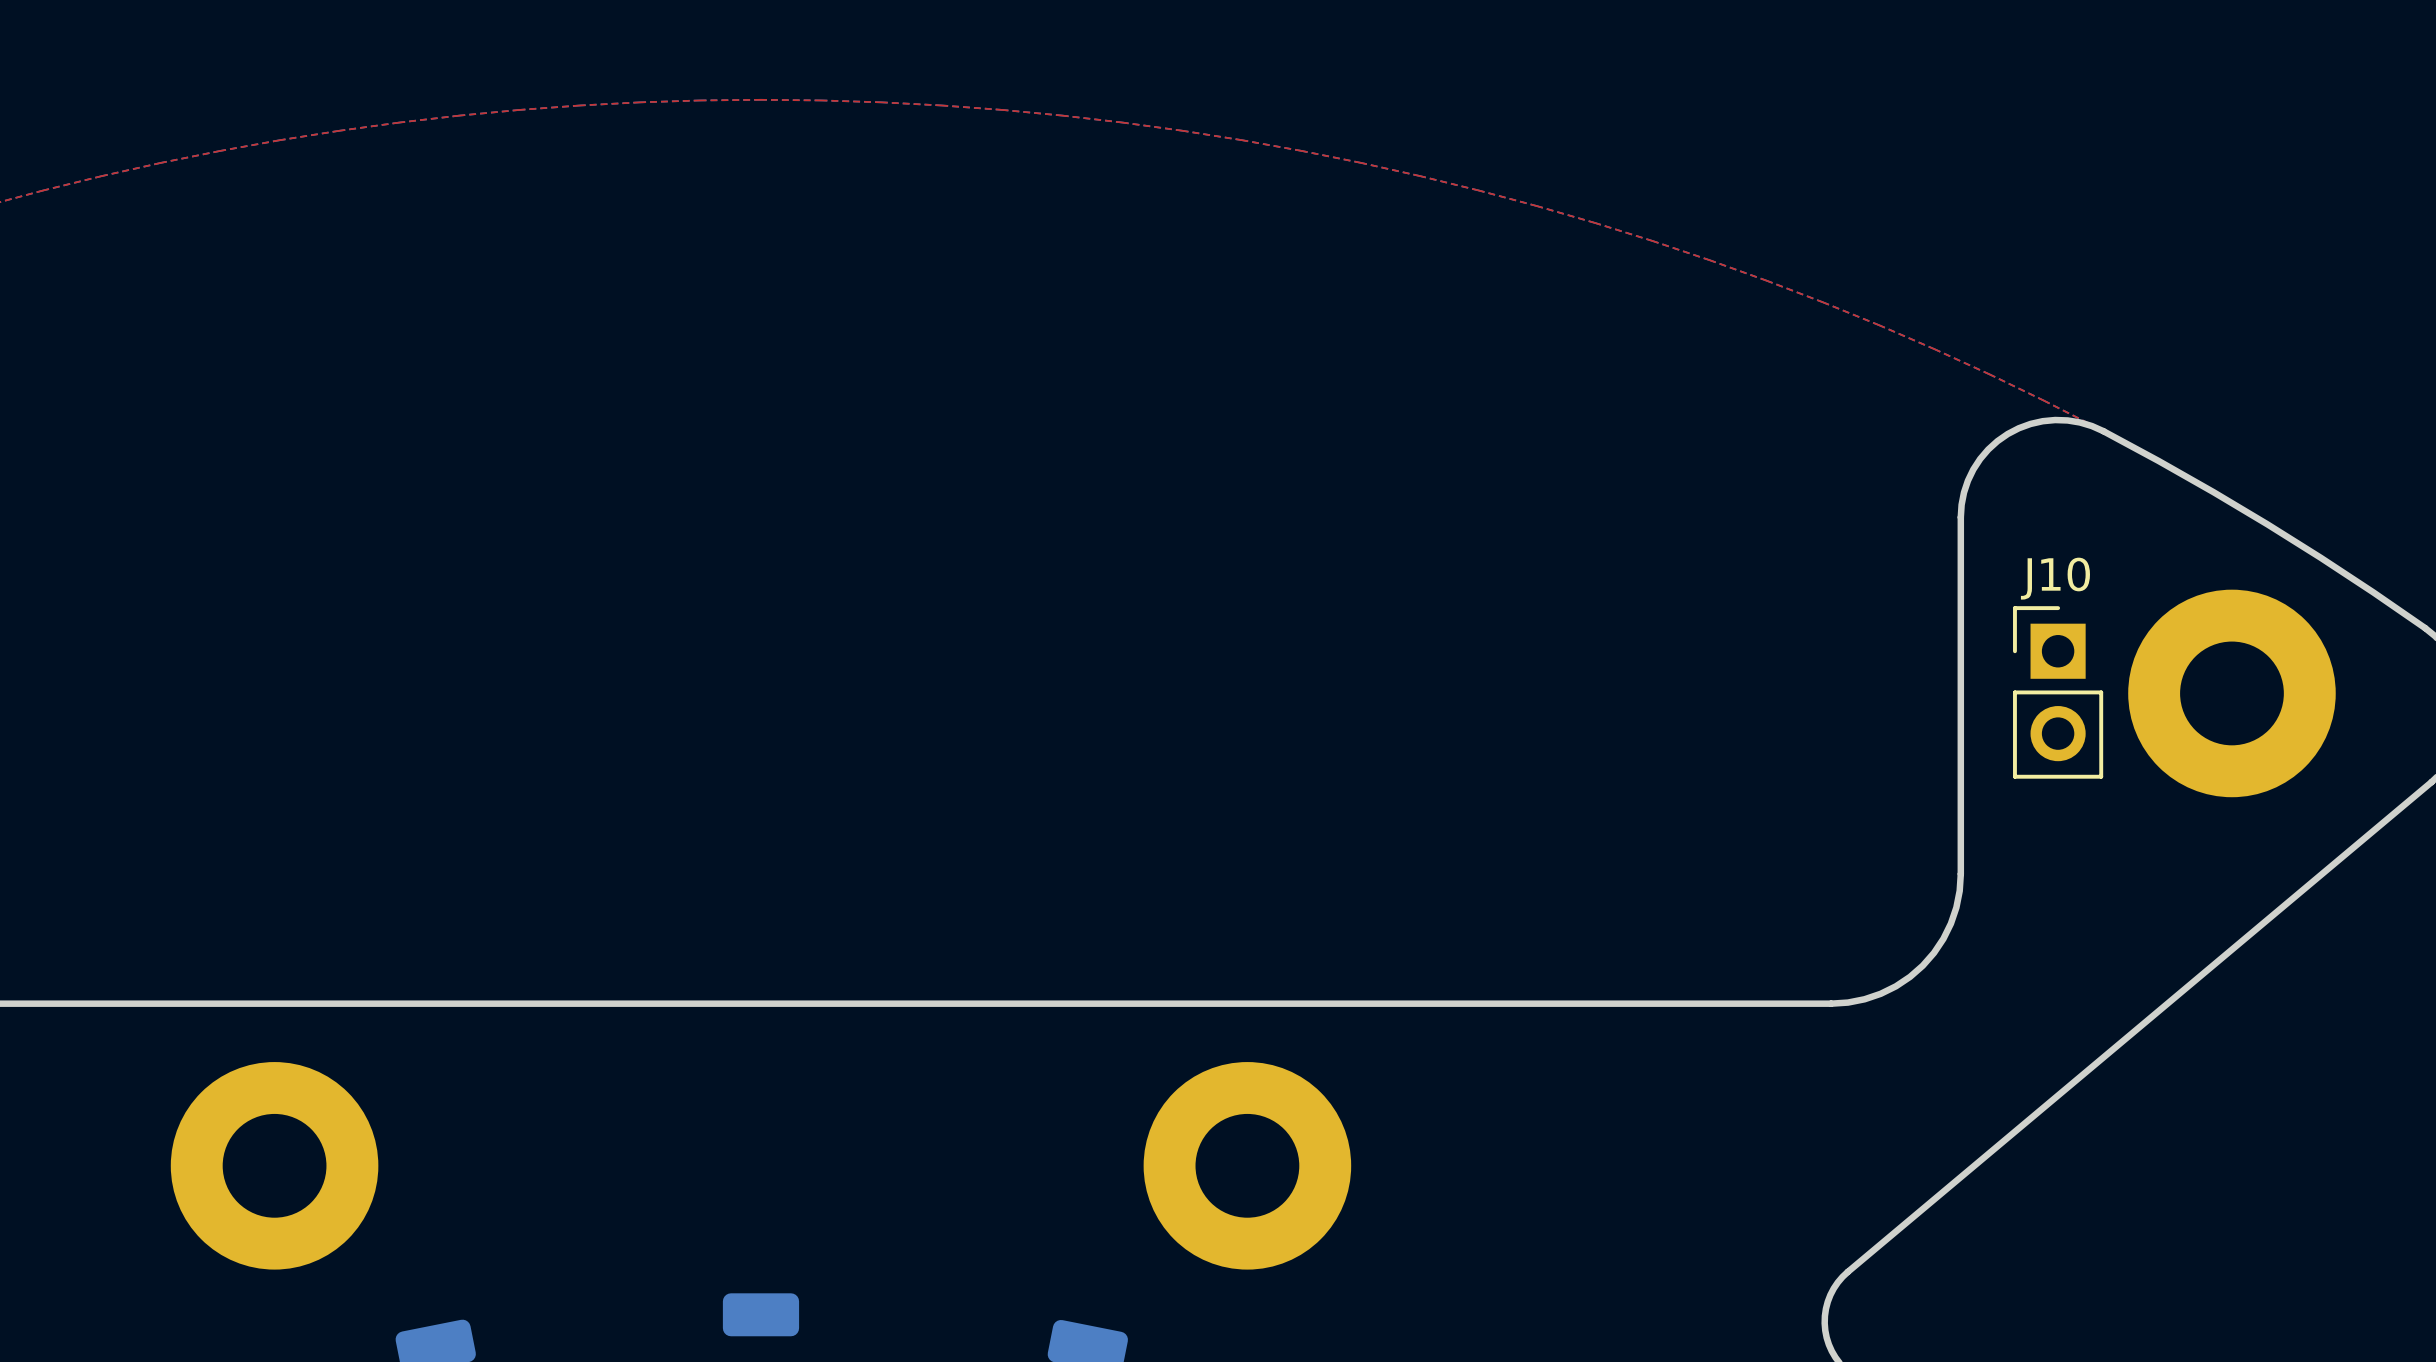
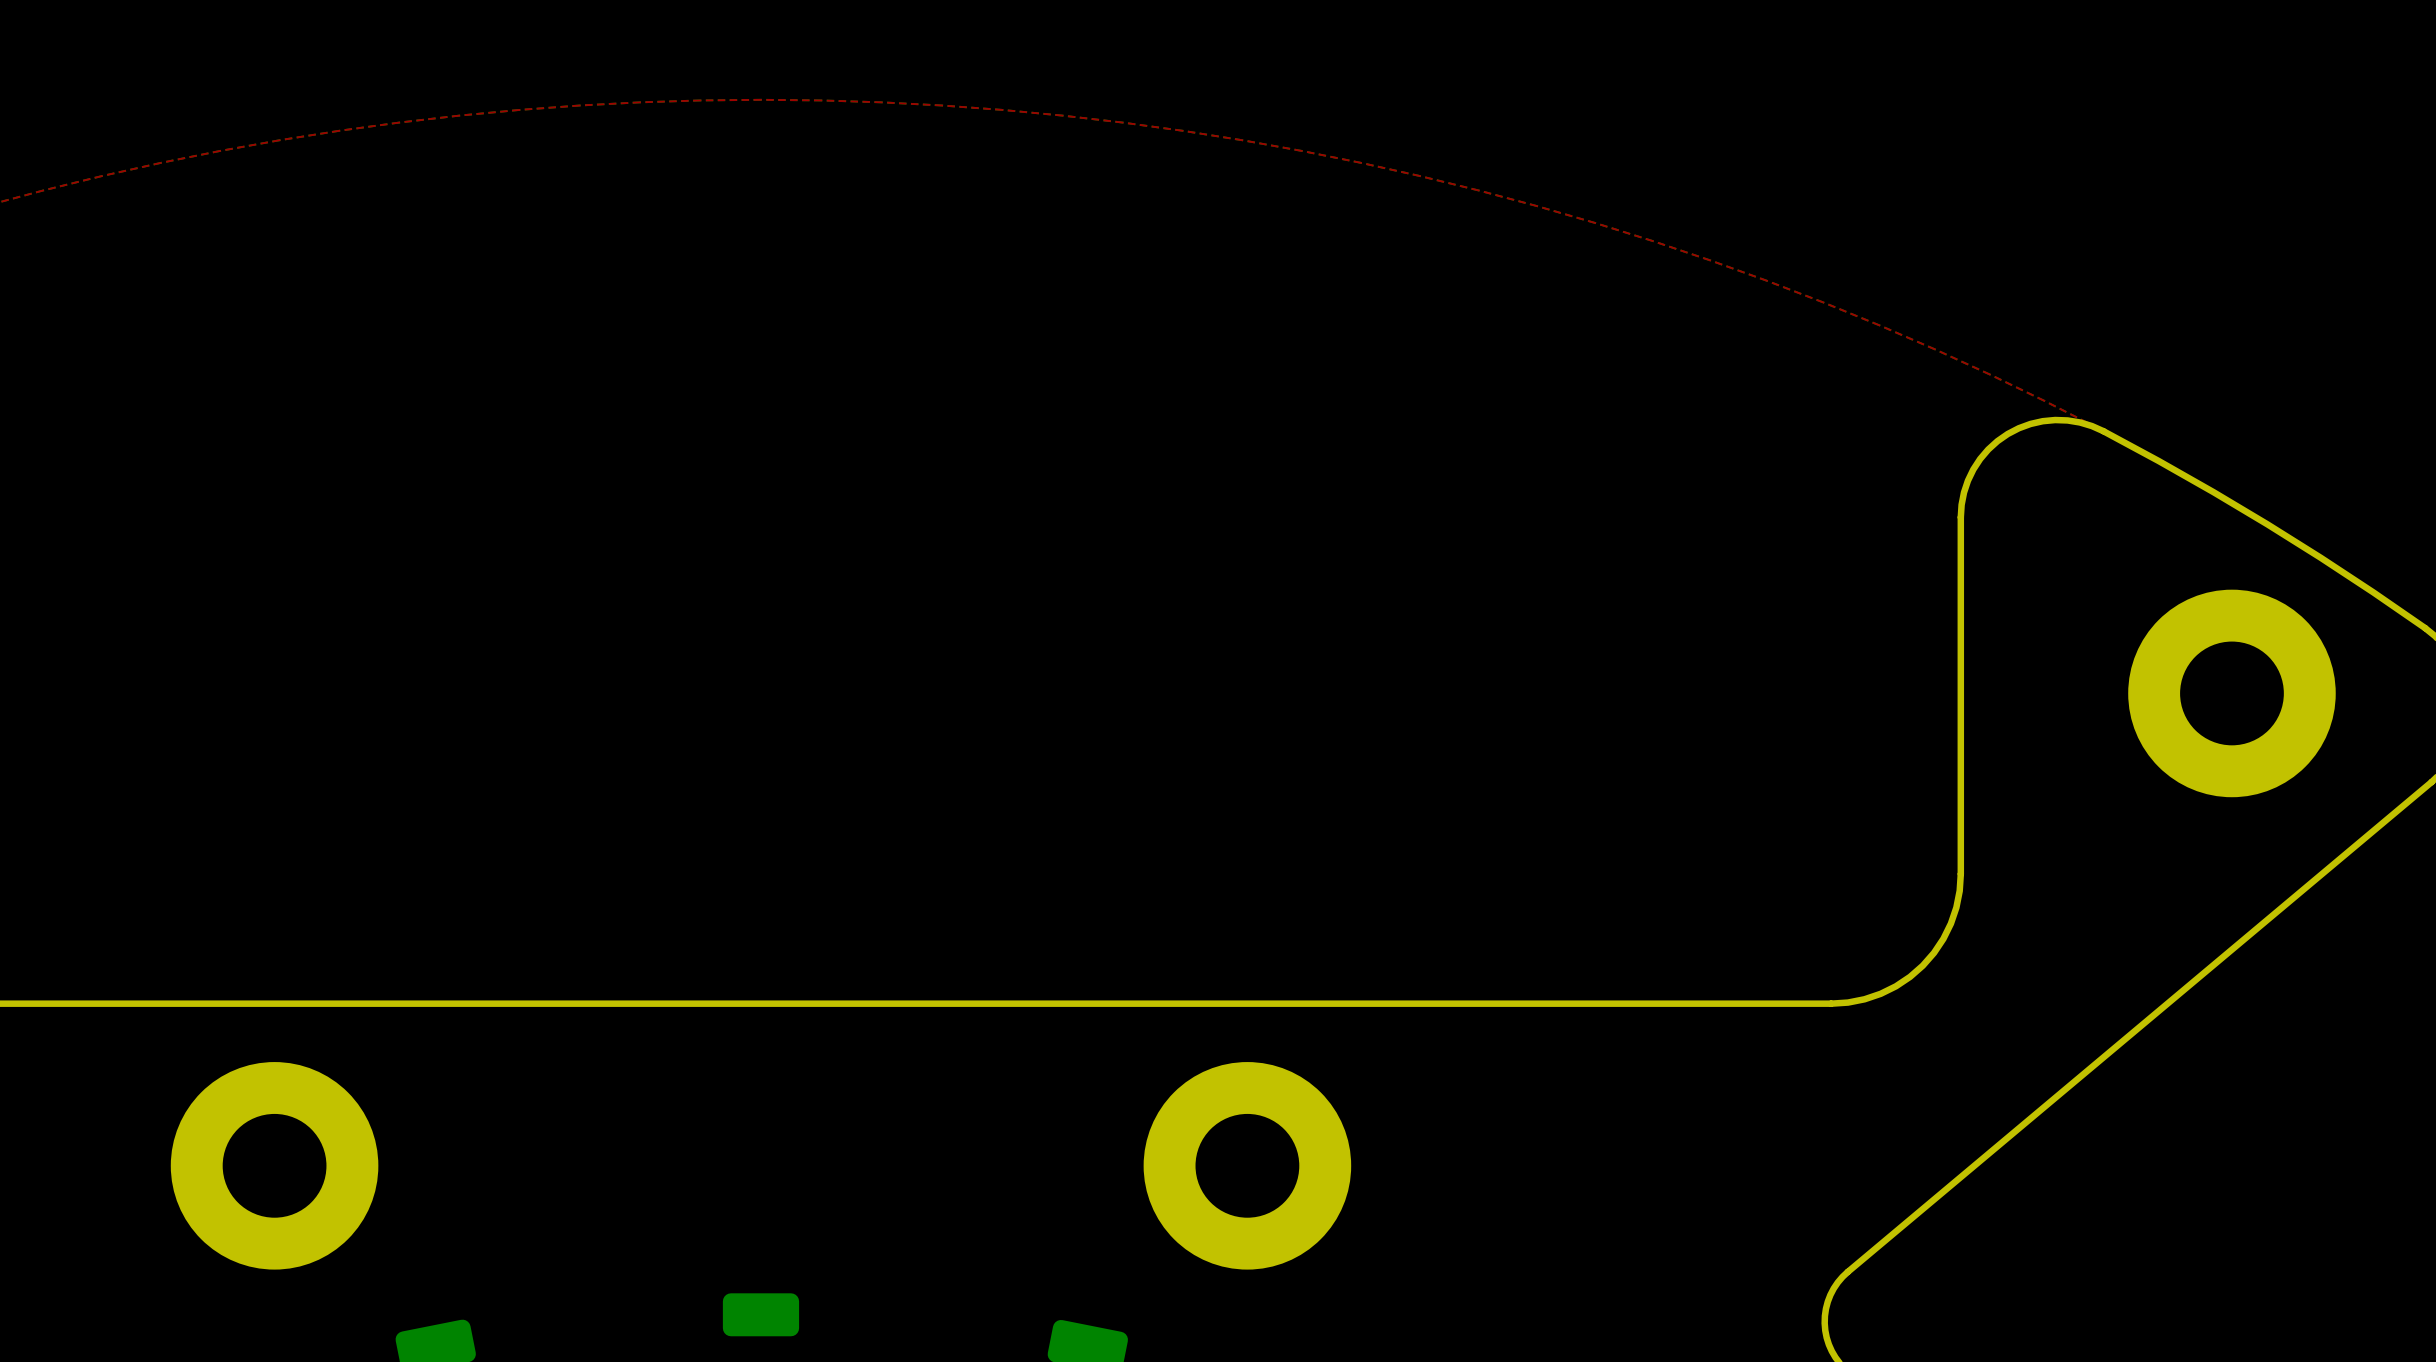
J10: (2058, 692) -> none

